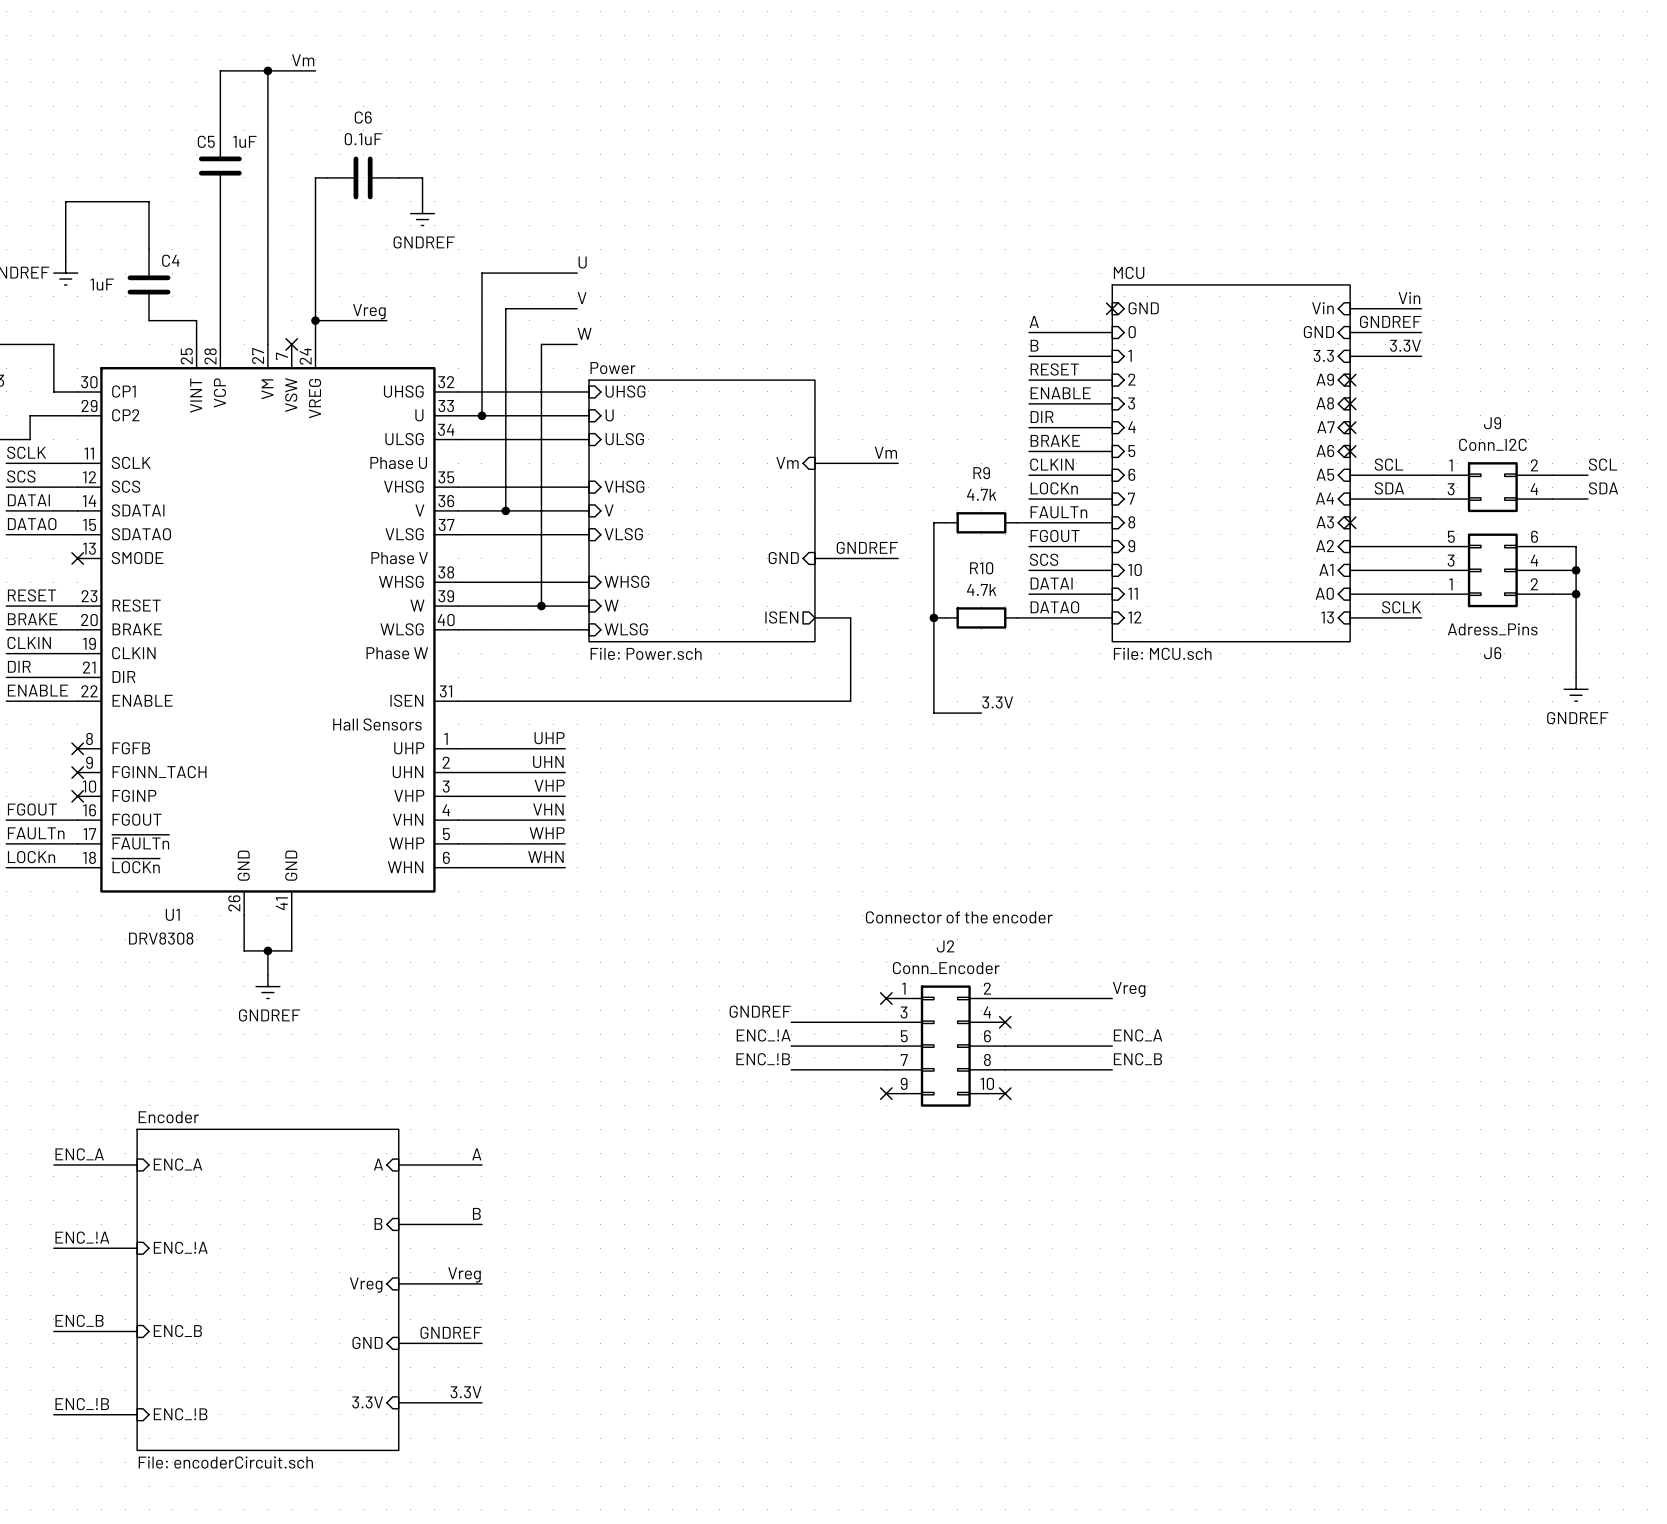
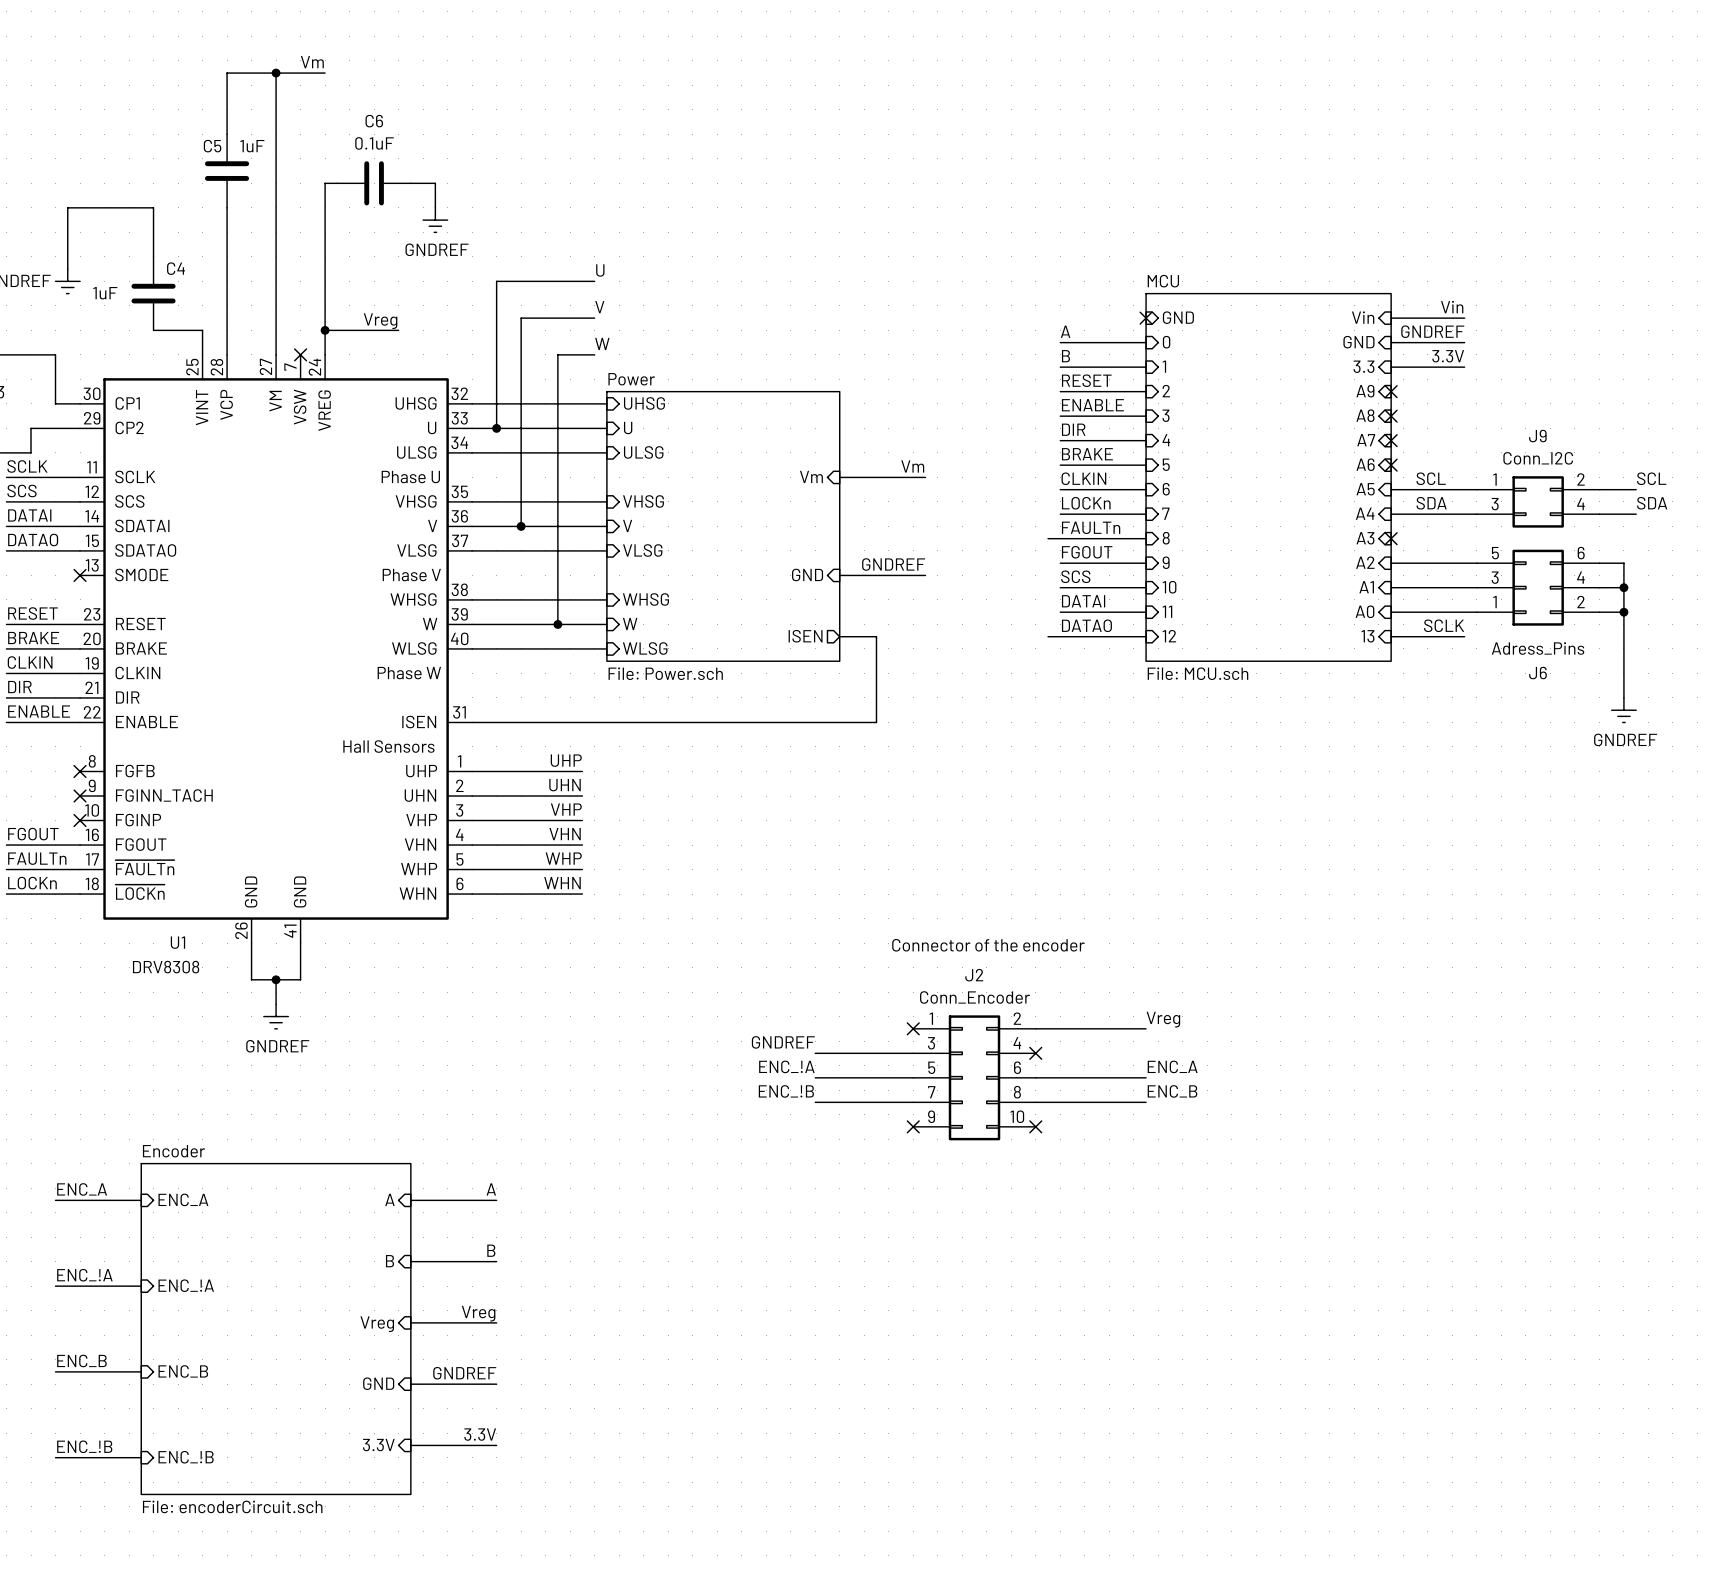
wire: (945, 522) (933, 522) (933, 713) (981, 713) -> none
R9: 4.7k (981, 522) -> none
wire: (933, 617) (945, 617) -> none
junction: (933, 617) -> none
R10: 4.7k (981, 617) -> none
label: 3.3V (997, 702) -> none

